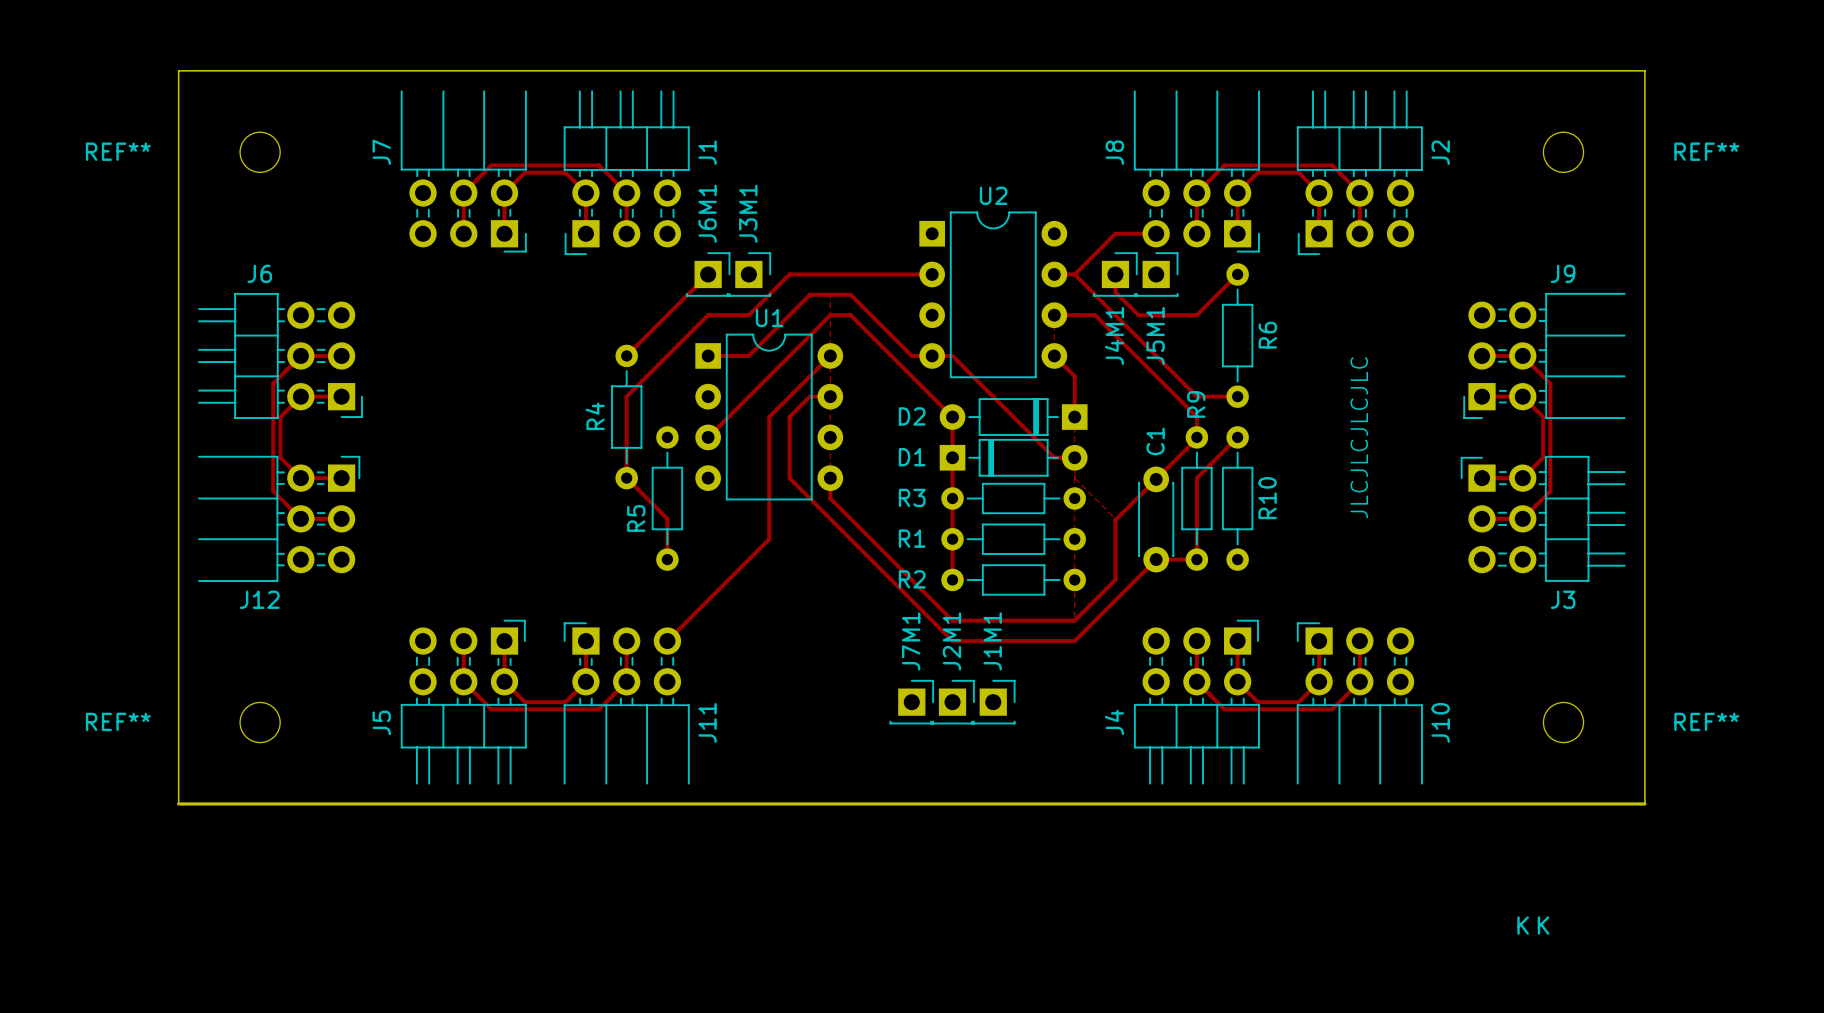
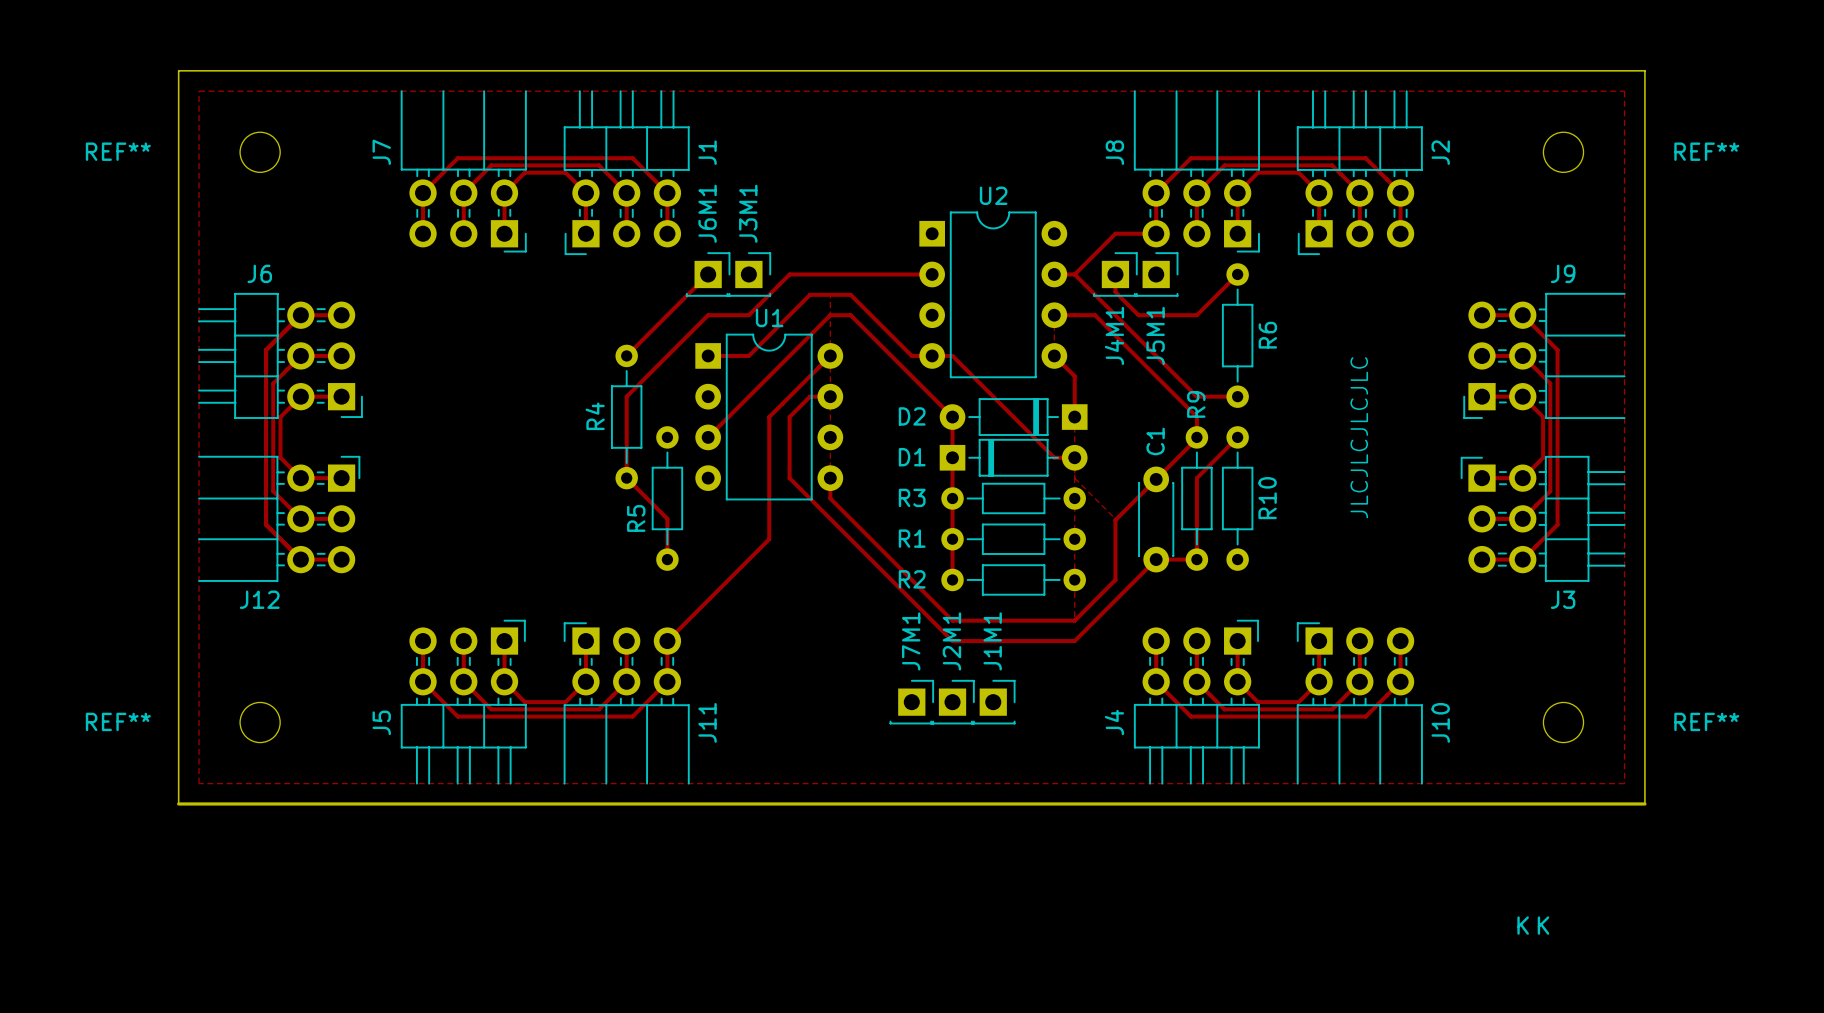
zone outline: none -> (199, 91) (199, 783) (1624, 783) (1624, 91) (199, 91)
track: none -> (423, 233) (423, 193) (457, 158) (632, 158) (667, 193) (667, 233)
track: none -> (1156, 233) (1156, 193) (1190, 158) (1365, 158) (1400, 193) (1400, 233)
track: none -> (341, 315) (300, 315) (266, 350) (266, 524) (300, 559) (341, 559)
track: none -> (1482, 315) (1522, 315) (1557, 350) (1557, 524) (1522, 559) (1482, 559)
track: none -> (423, 641) (423, 681) (457, 716) (632, 716) (667, 681) (667, 641)
track: none -> (1156, 641) (1156, 681) (1190, 716) (1365, 716) (1400, 681) (1400, 641)

